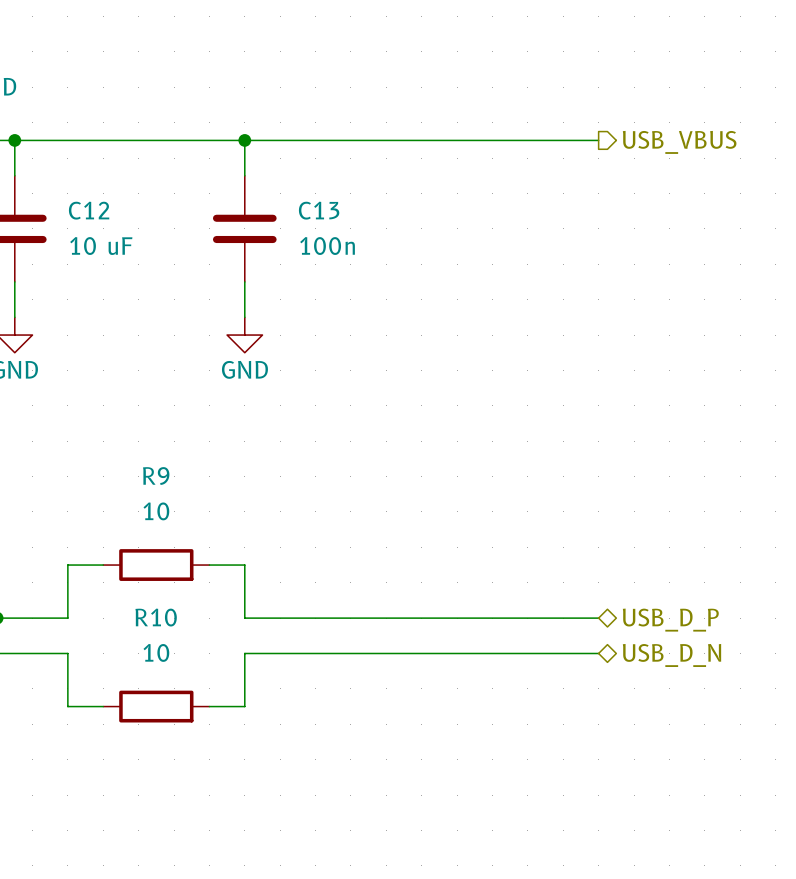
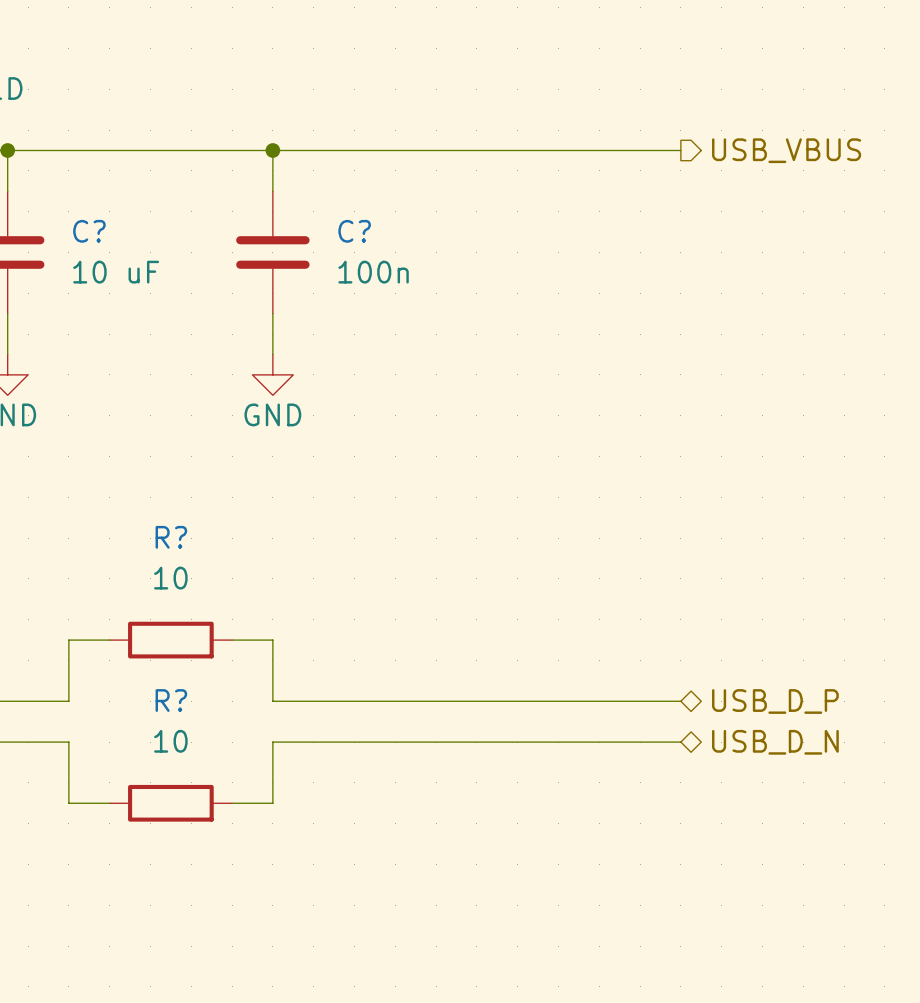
C12 name: C12 (89, 210) -> C? (89, 231)
C13 name: C13 (319, 210) -> C? (354, 231)
R9 name: R9 (156, 476) -> R? (171, 537)
R10 name: R10 (156, 617) -> R? (171, 700)

